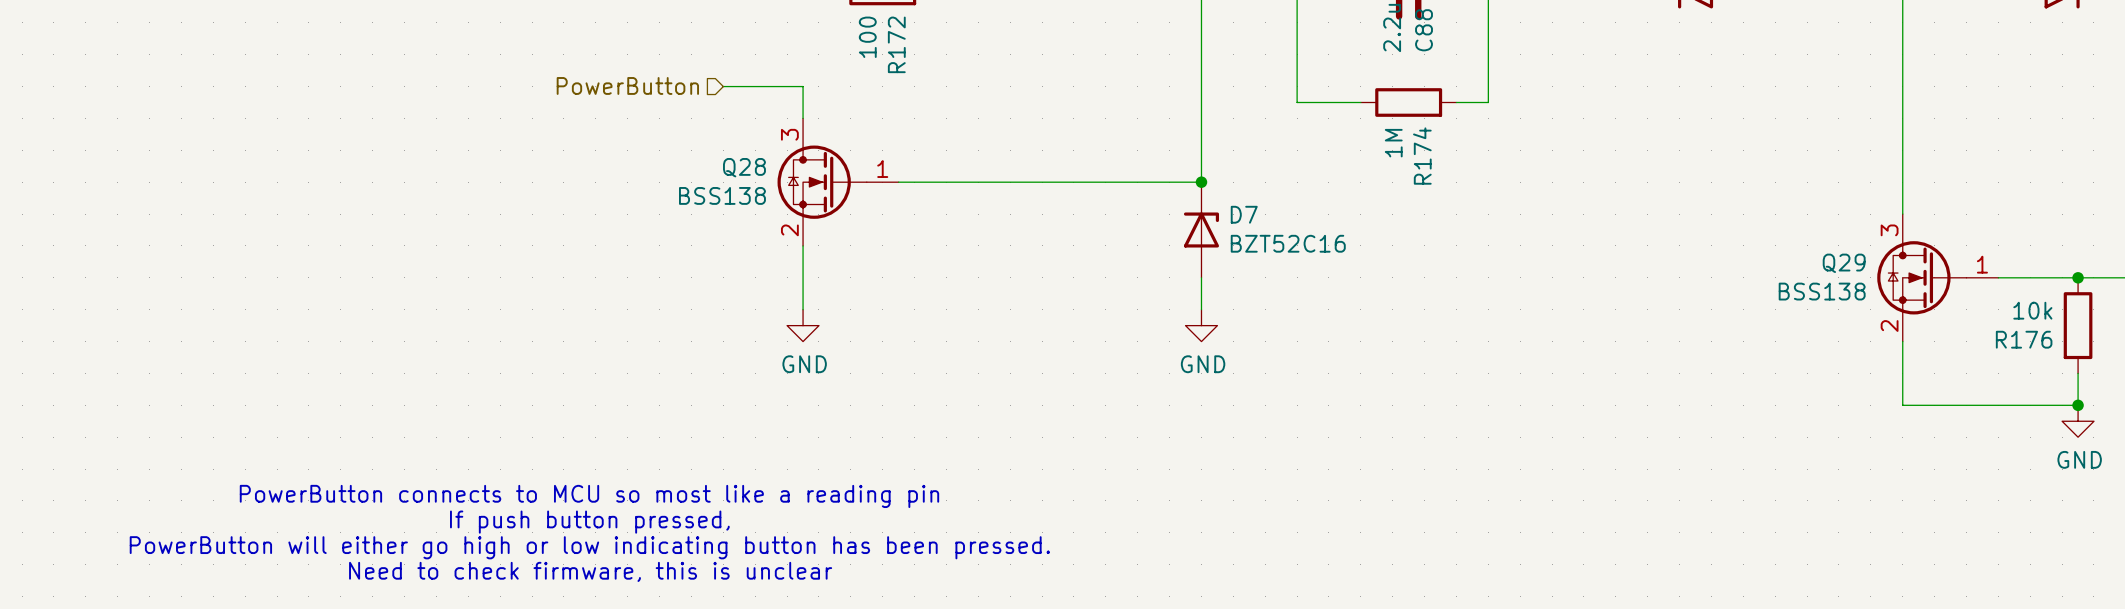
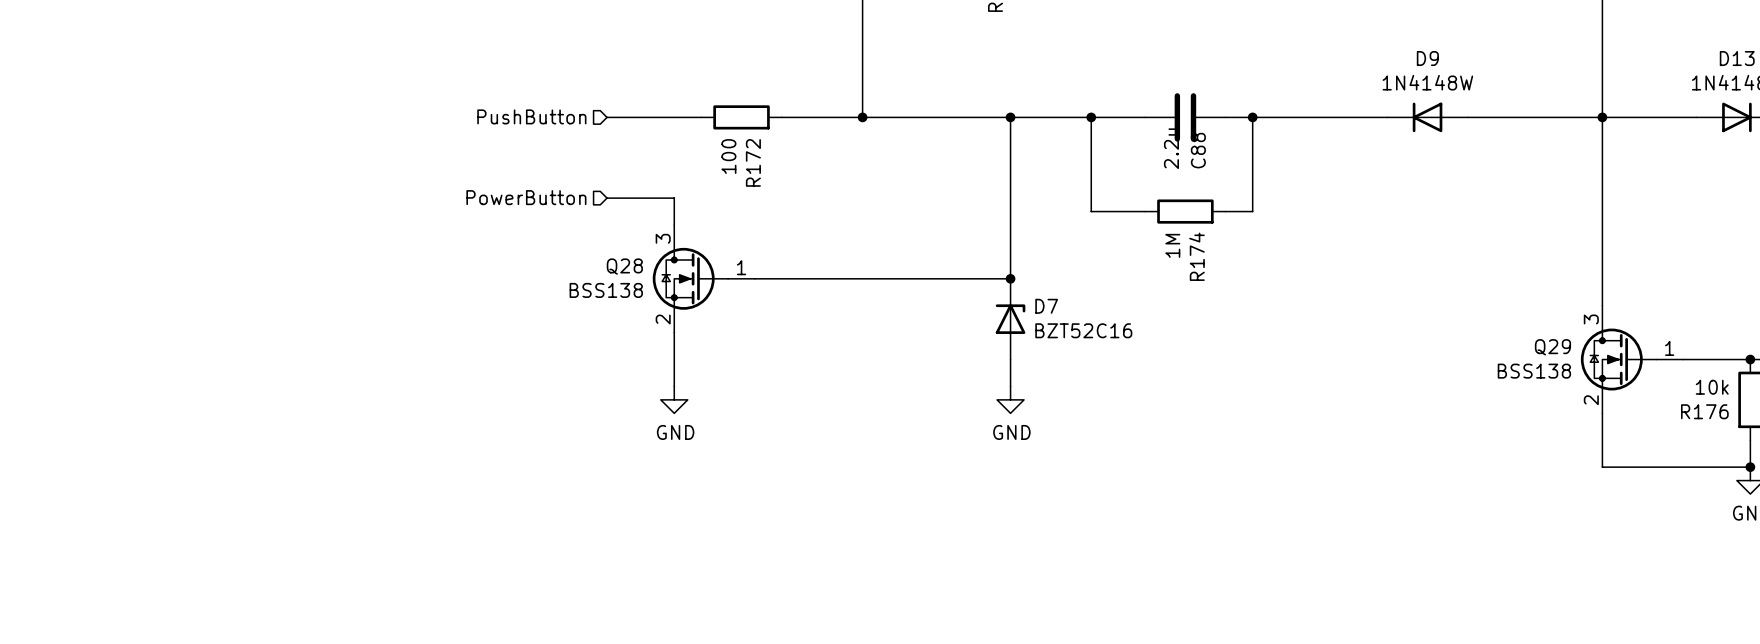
text: PowerButton connects to MCU so most like a reading pin (589, 496) -> none
text: If push button pressed, (589, 522) -> none
text: PowerButton will either go high or low indicating button has been pressed. (589, 547) -> none
text: Need to check firmware, this is unclear (590, 571) -> none

